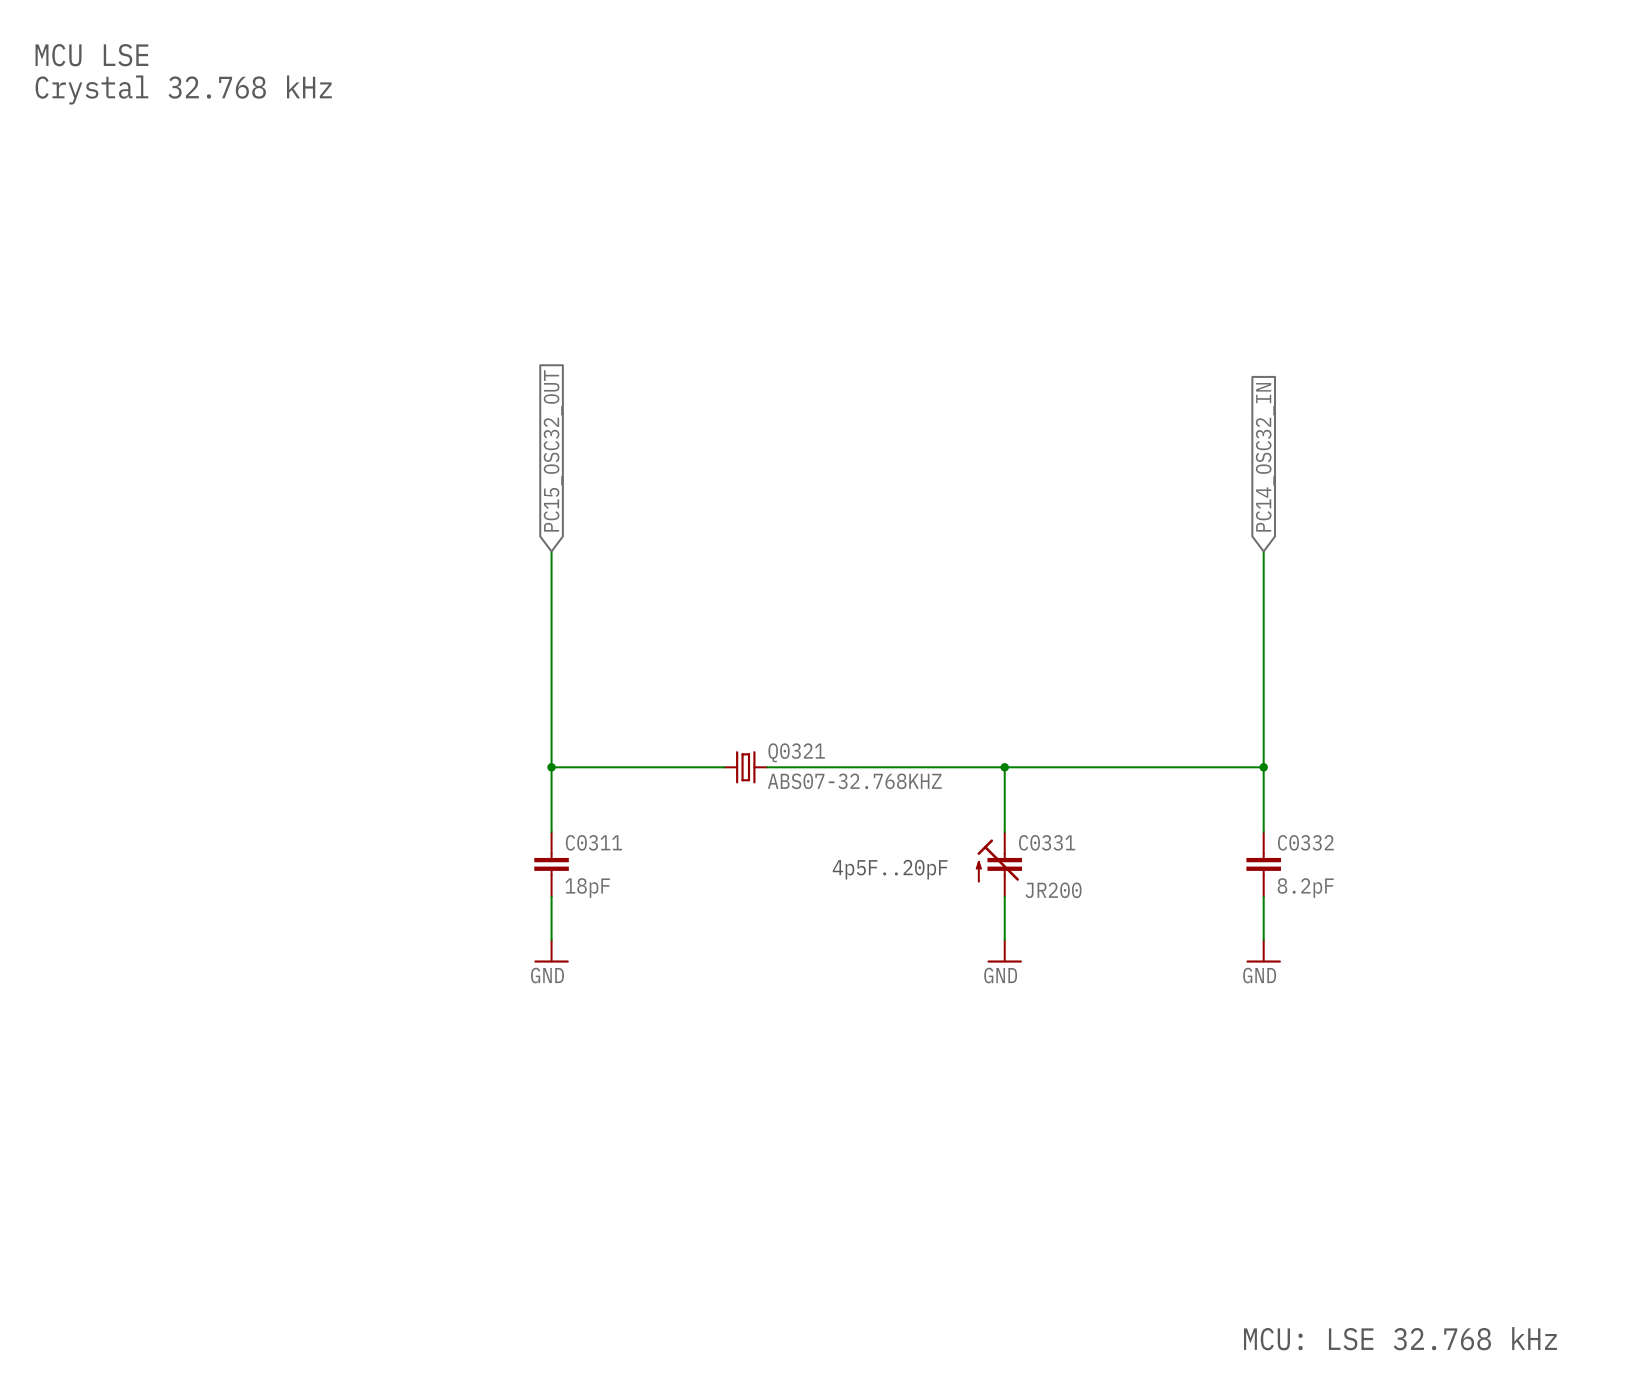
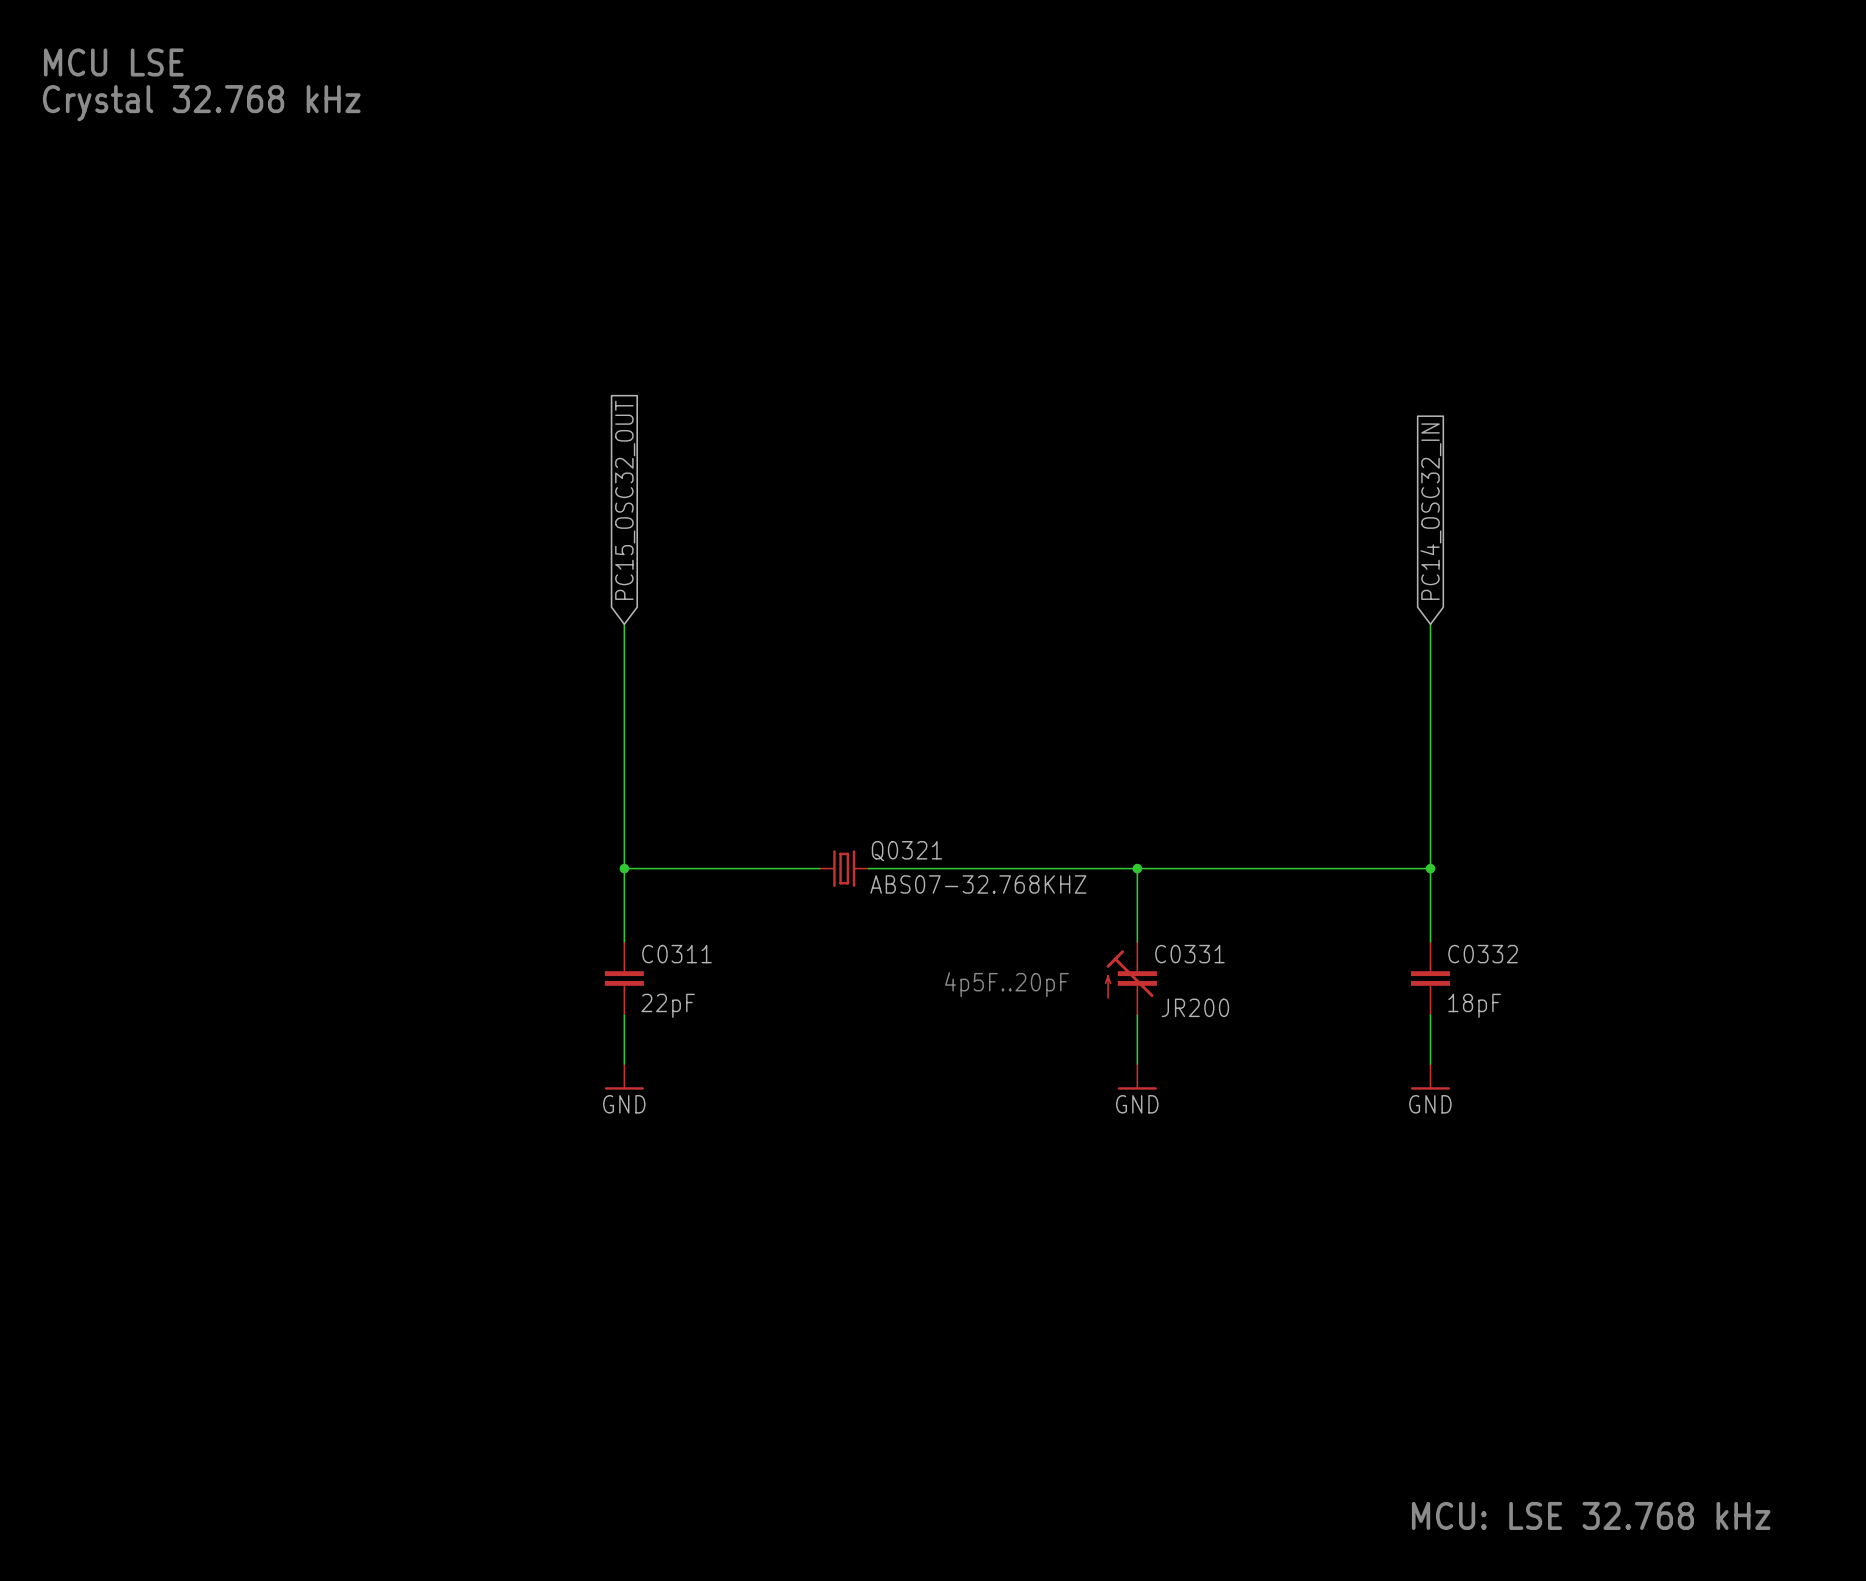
C0311 value: 18pF (587, 888) -> 22pF (668, 1005)
C0332 value: 8.2pF (1305, 888) -> 18pF (1474, 1005)

